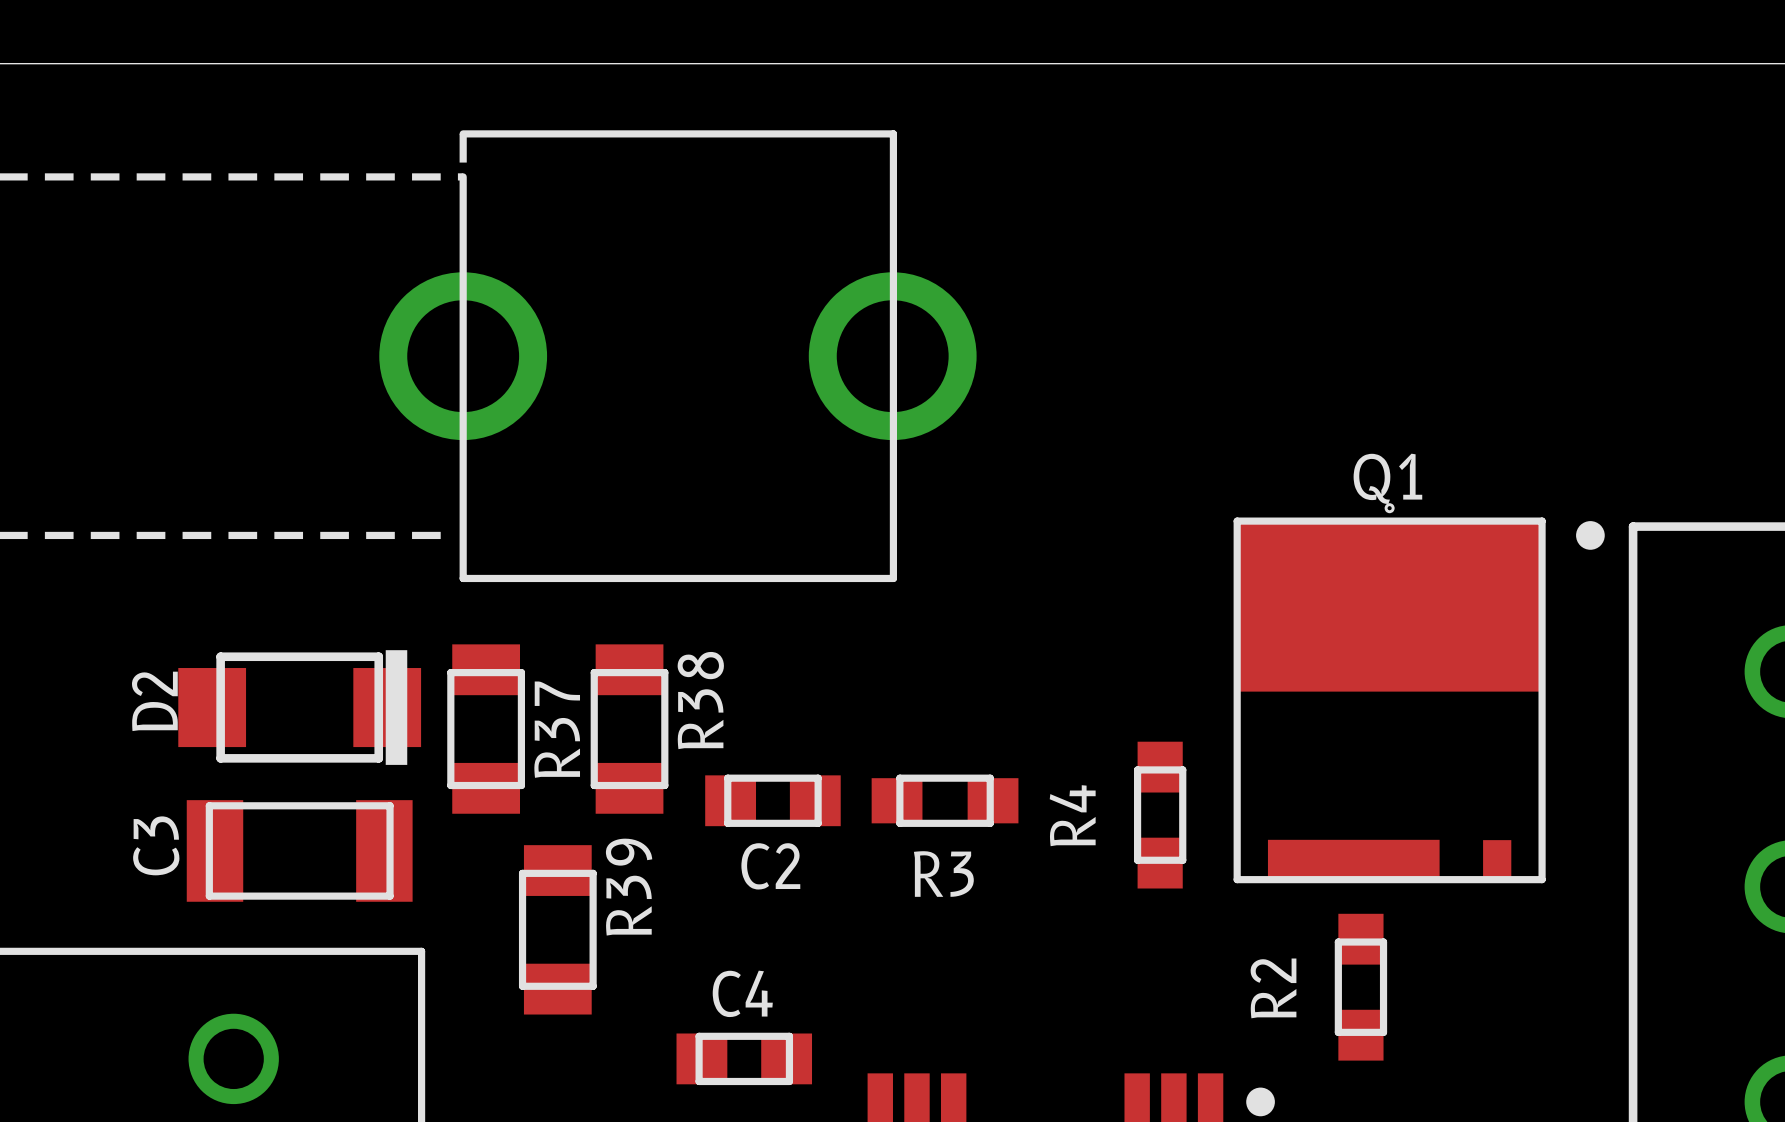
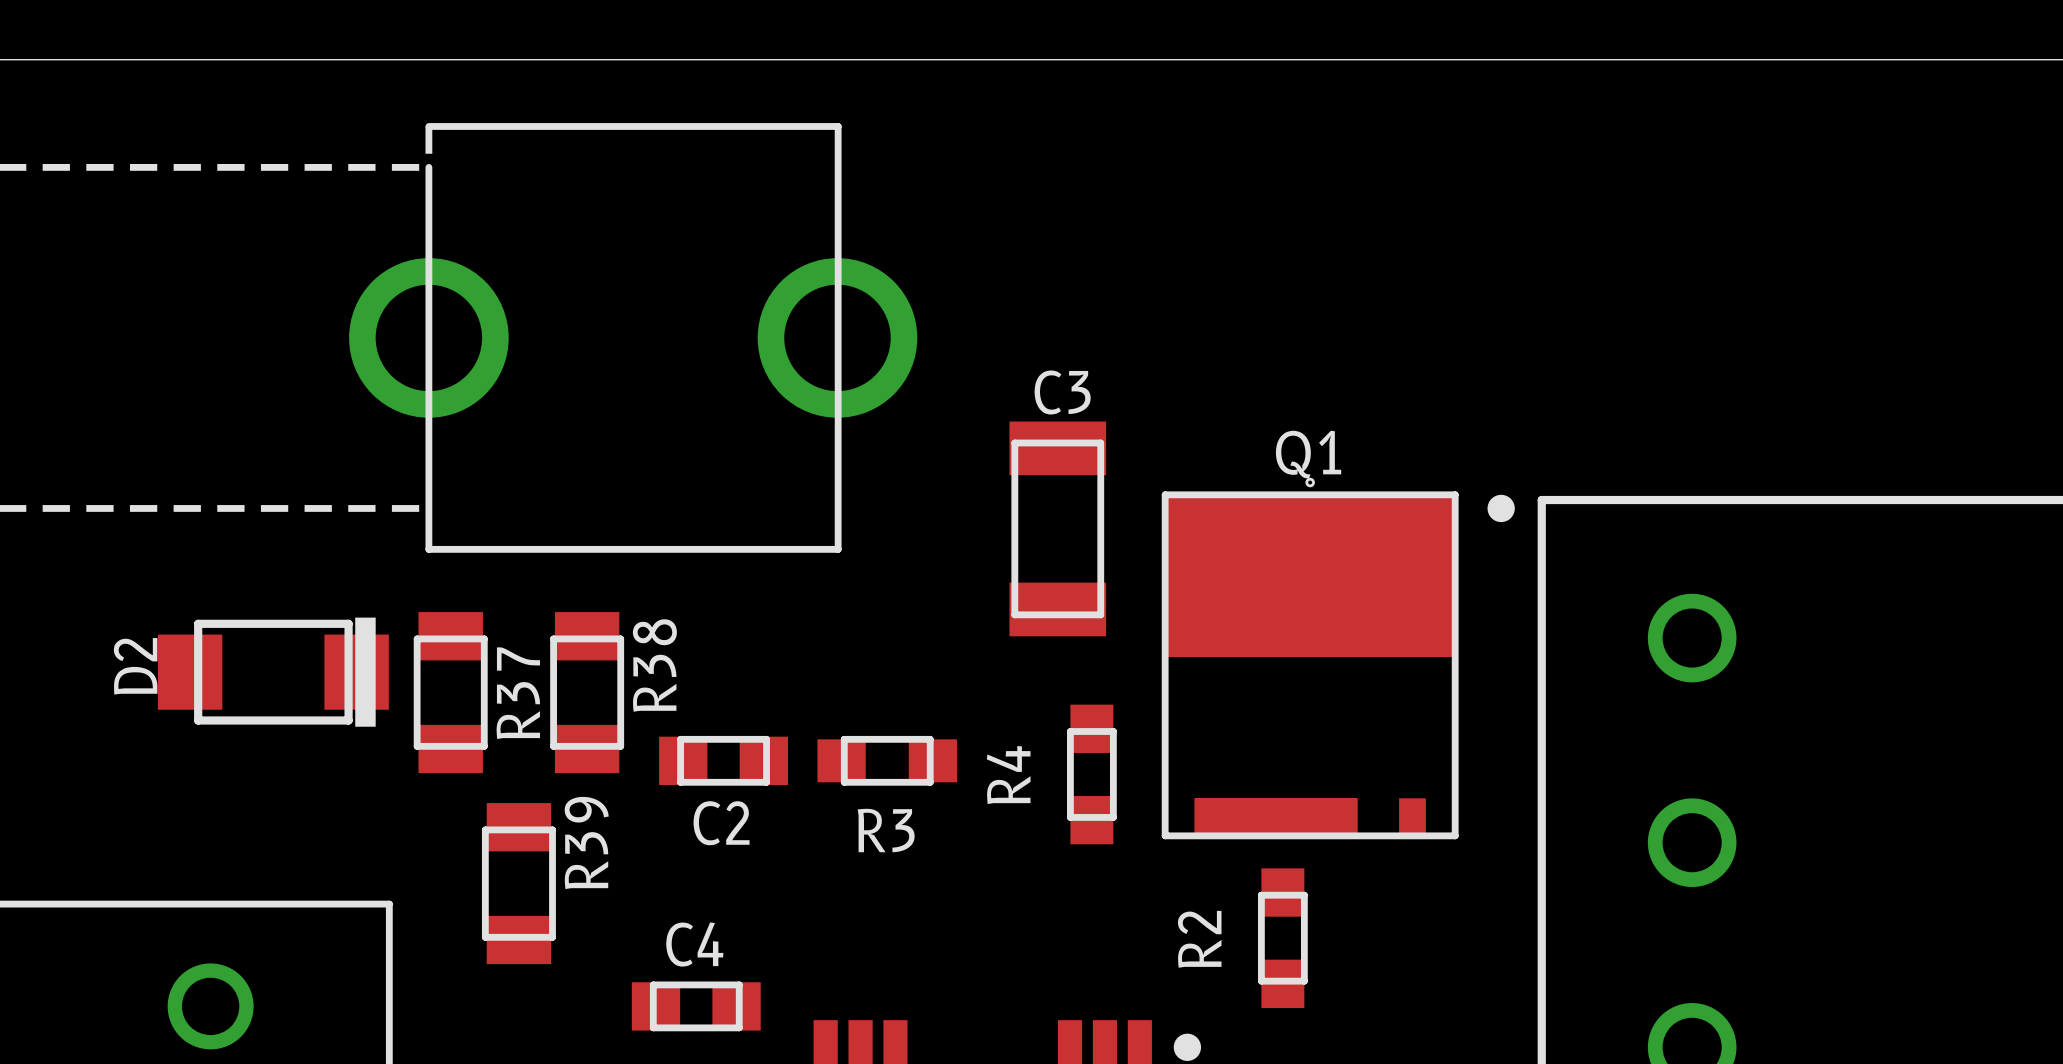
C3 rotation: 0° (299, 850) -> 90° clockwise (1057, 528)
C3 position: (299, 850) -> (1057, 528)

